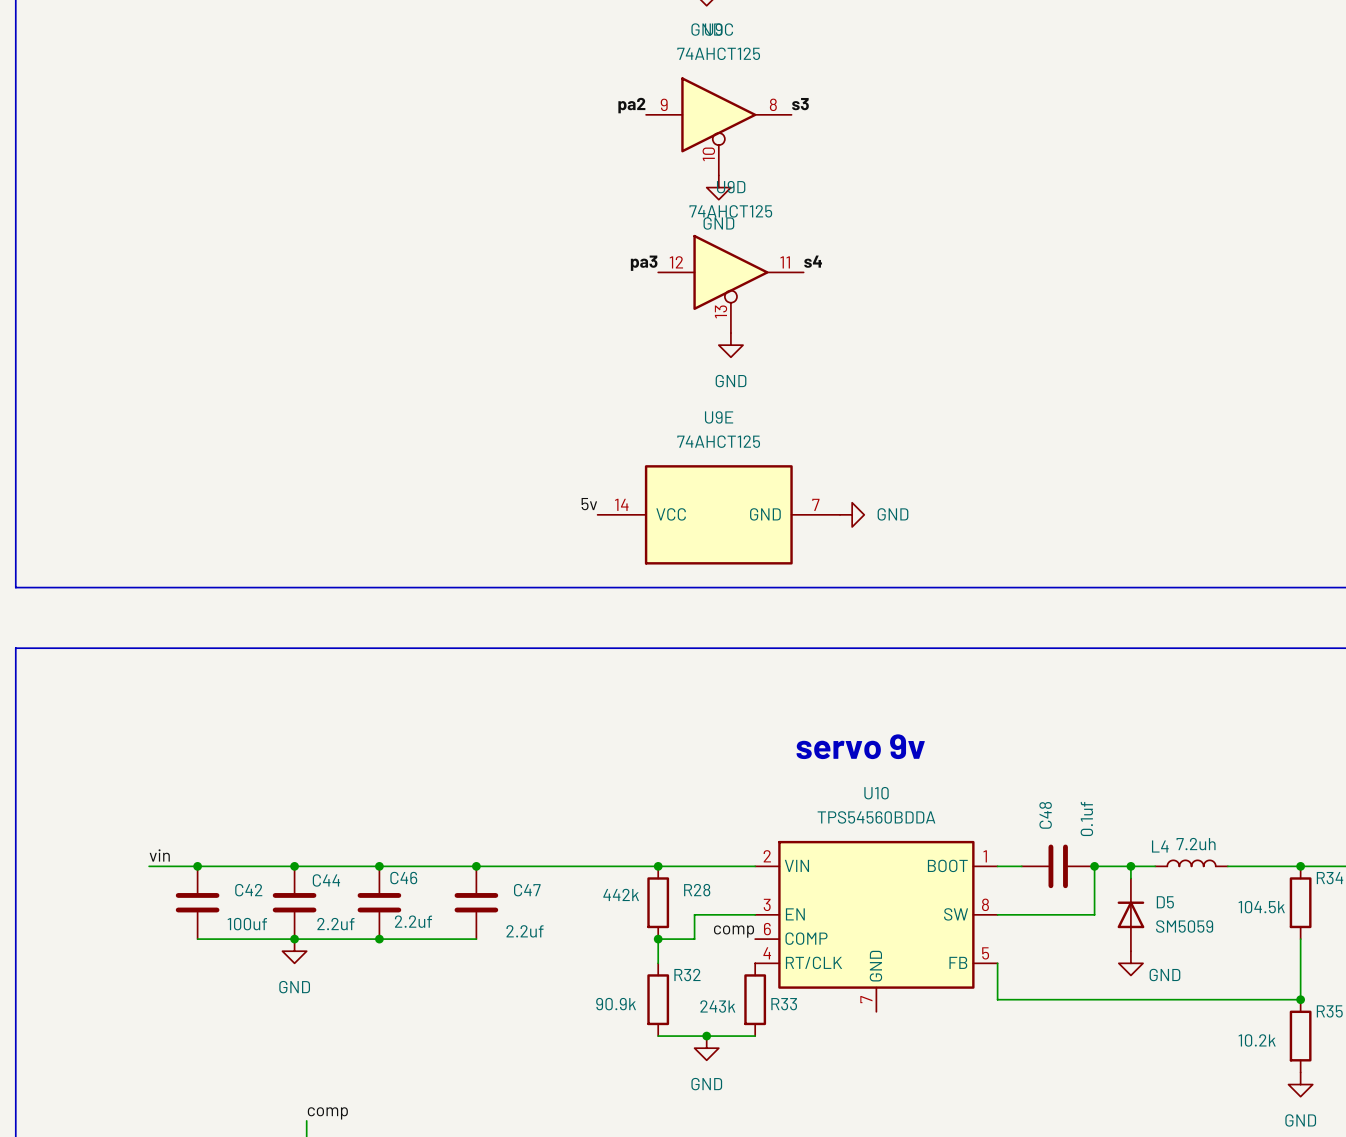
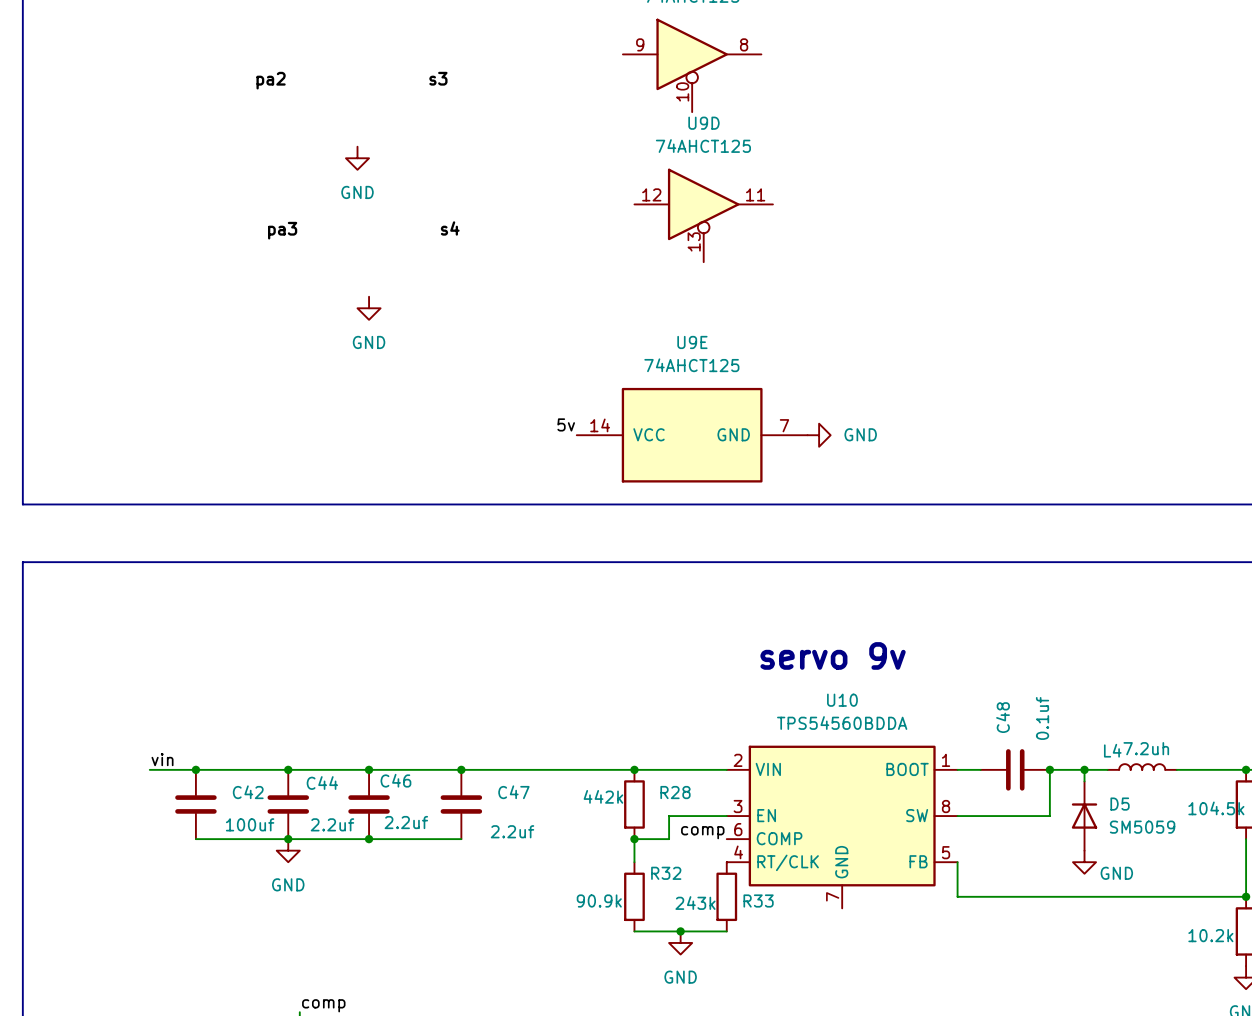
label: s3 (800, 104) -> none
label: pa2 (631, 105) -> none
label: none -> s3 (438, 78)
label: none -> pa2 (271, 80)
power symbol: GND (718, 187) -> none
power symbol: none -> GND (357, 158)
label: s4 (813, 261) -> none
label: pa3 (644, 263) -> none
label: none -> s4 (450, 228)
label: none -> pa3 (282, 230)
power symbol: GND (730, 345) -> none
power symbol: none -> GND (369, 308)

